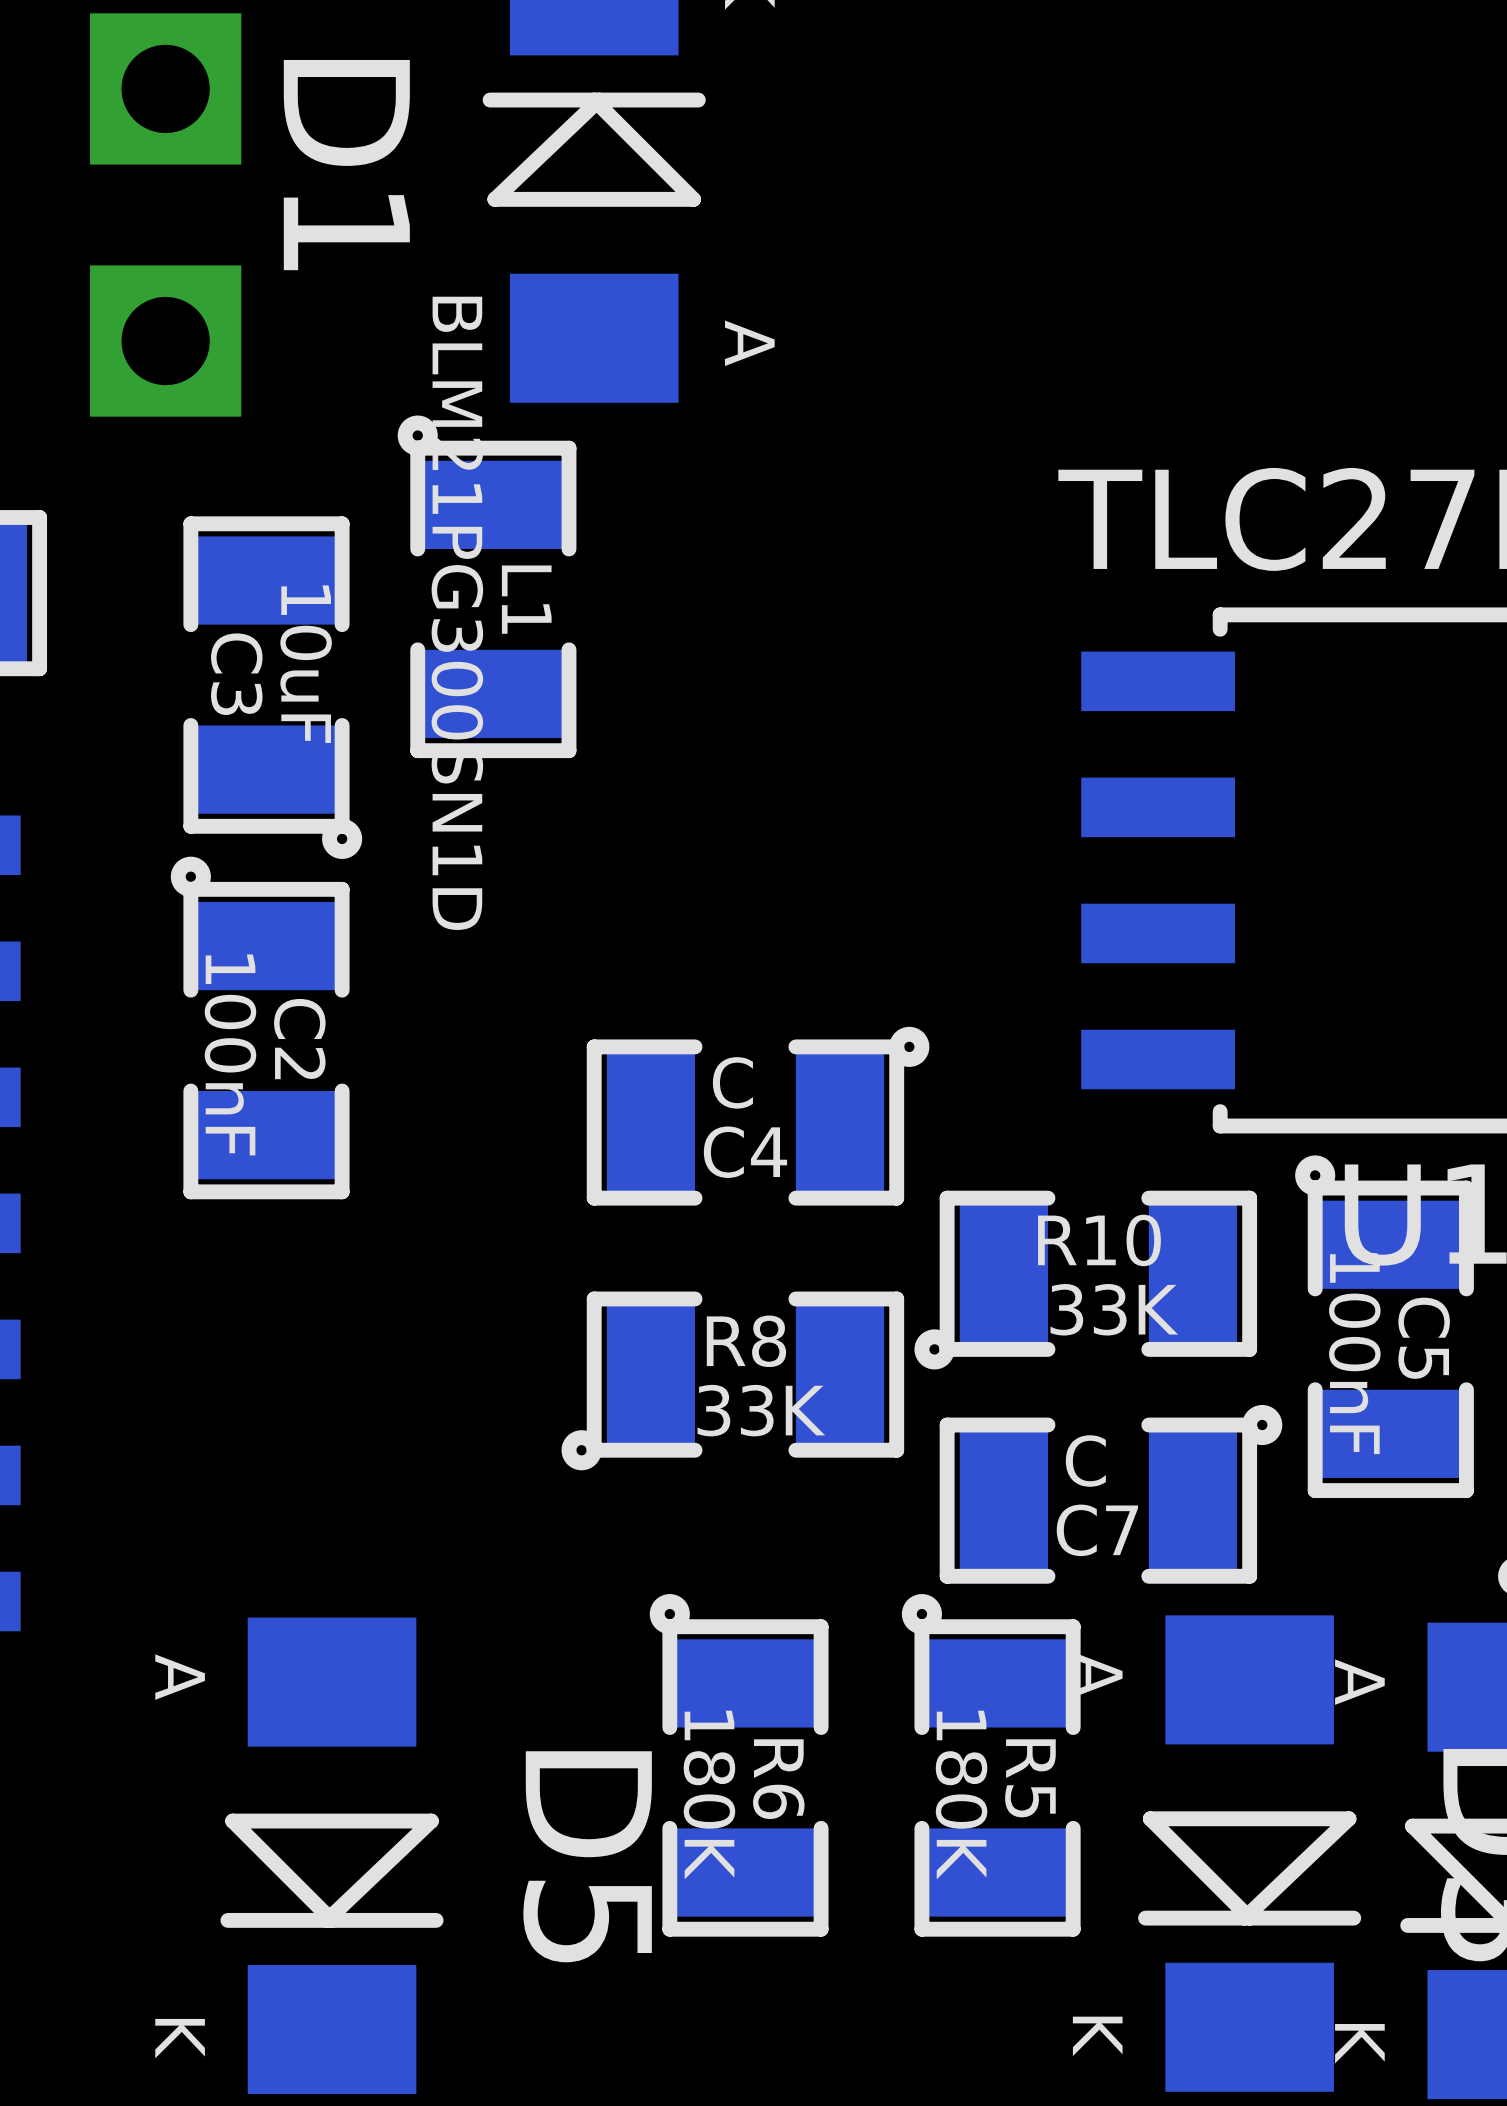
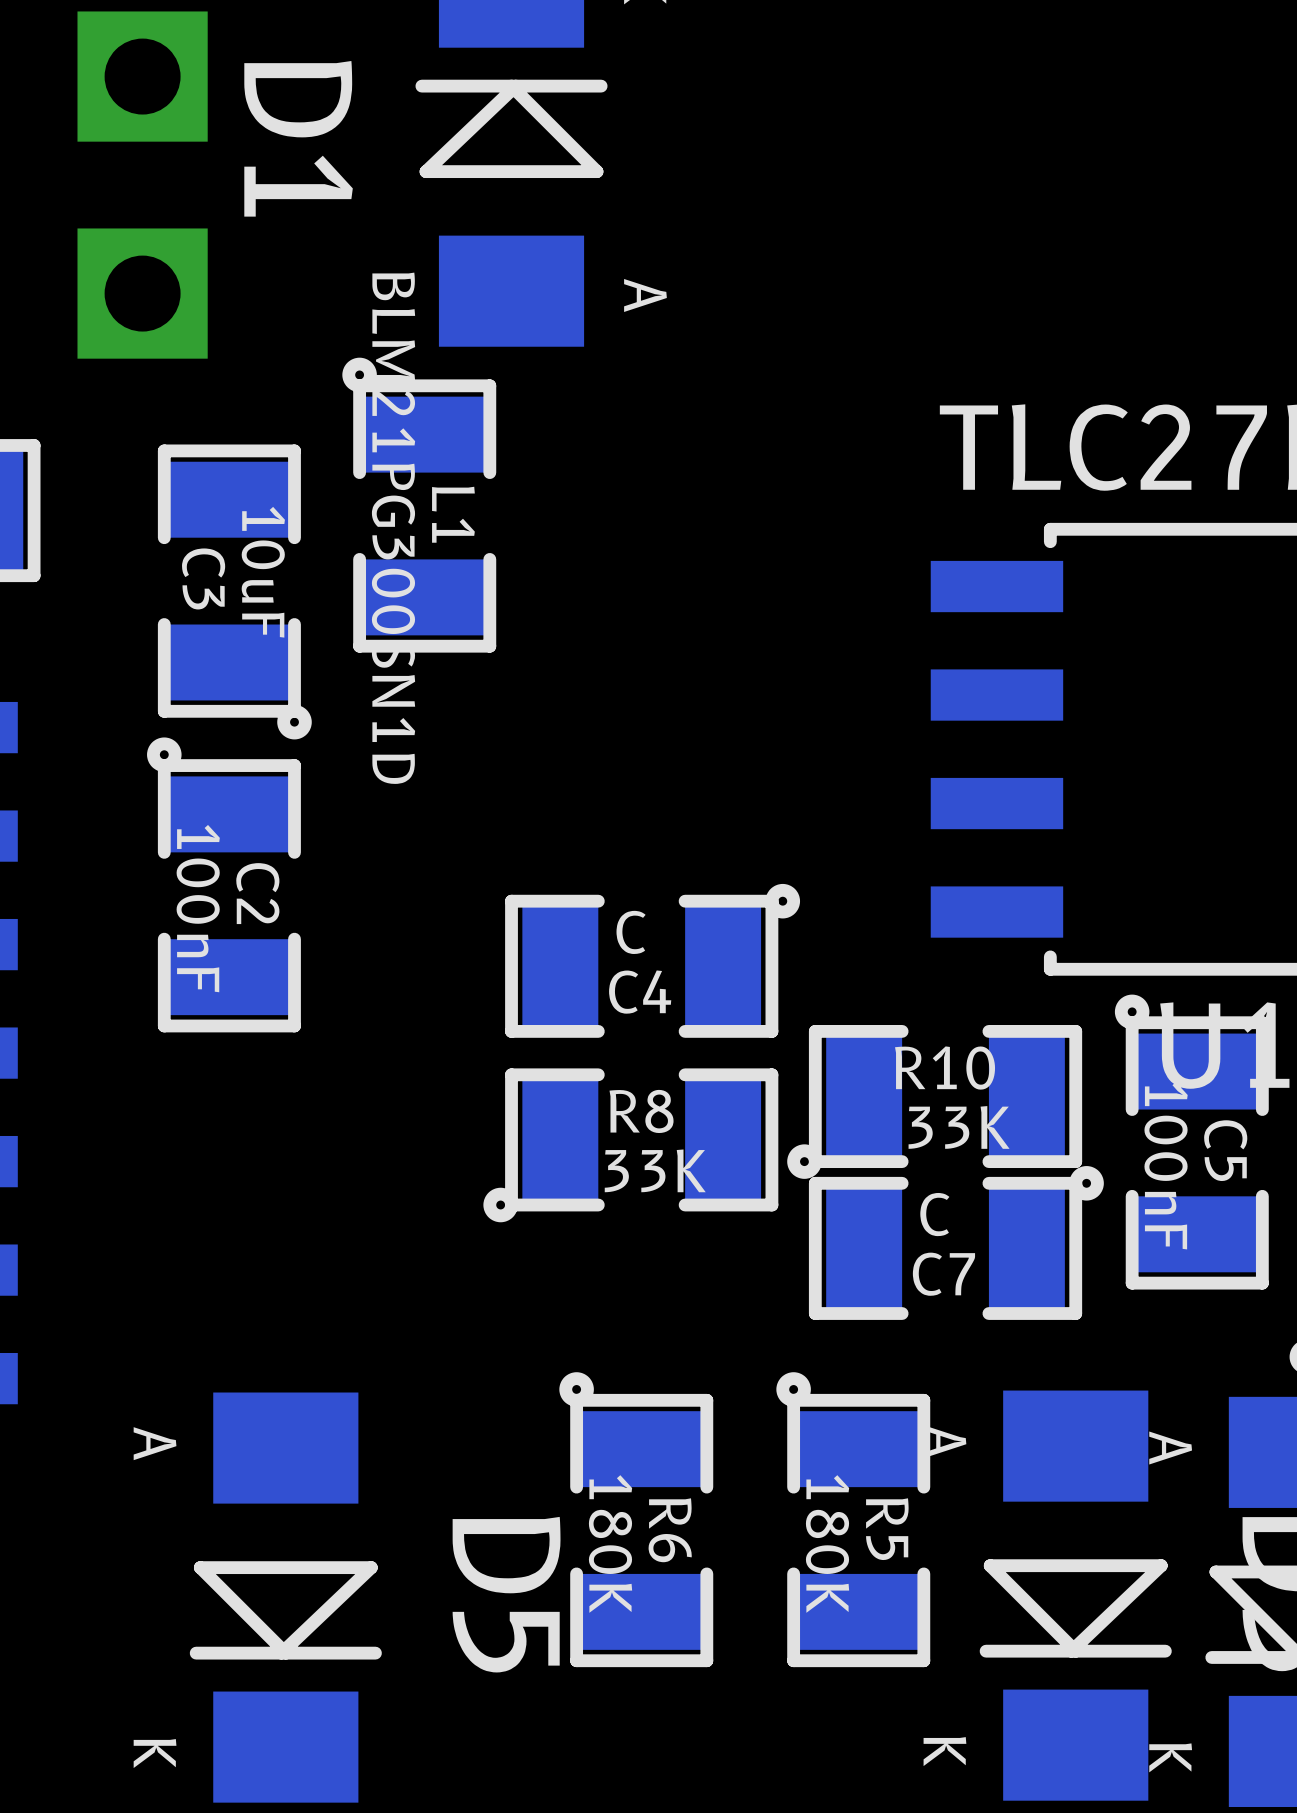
R8 position: (732, 1380) -> (630, 1145)
C7 position: (1110, 1494) -> (956, 1242)

